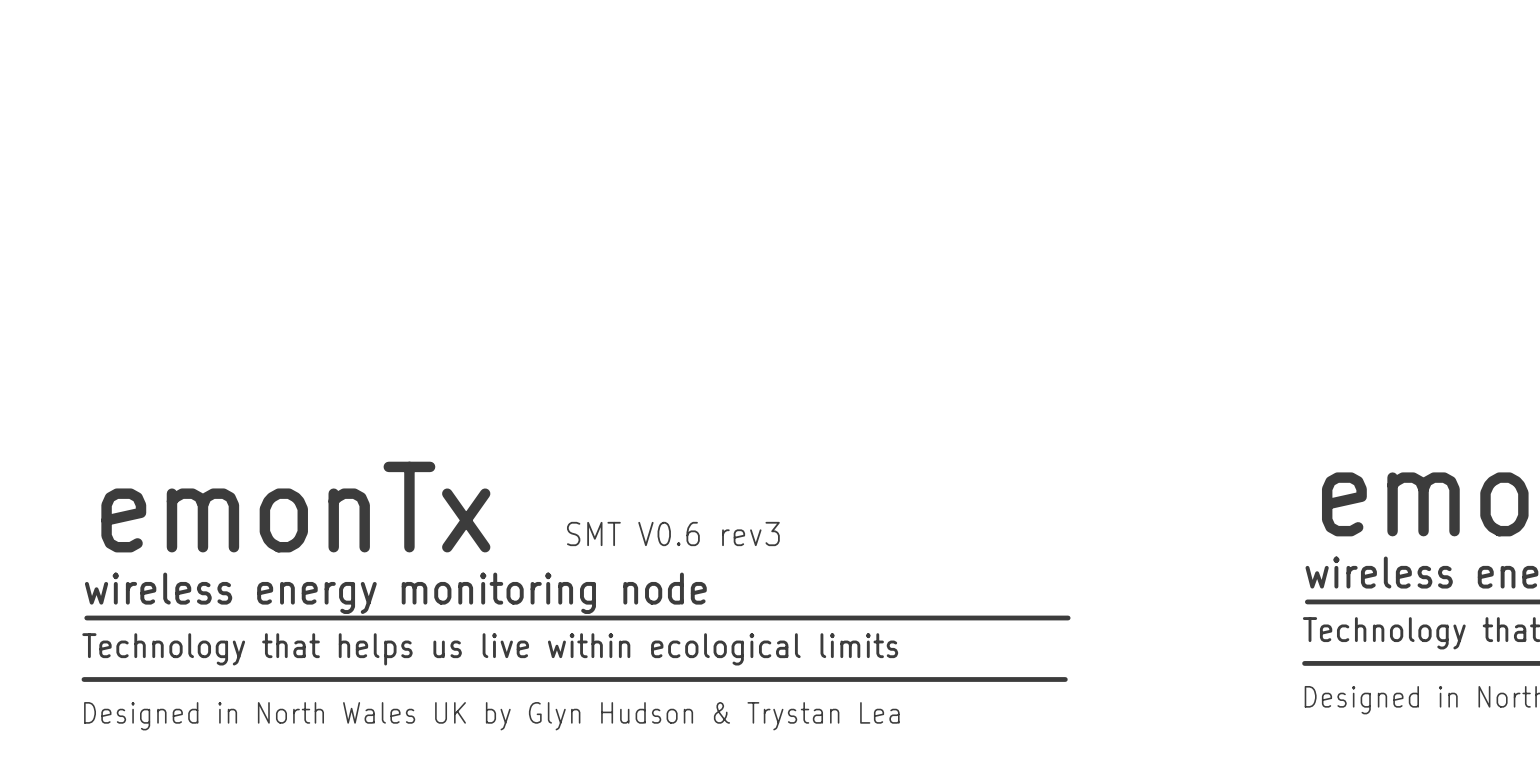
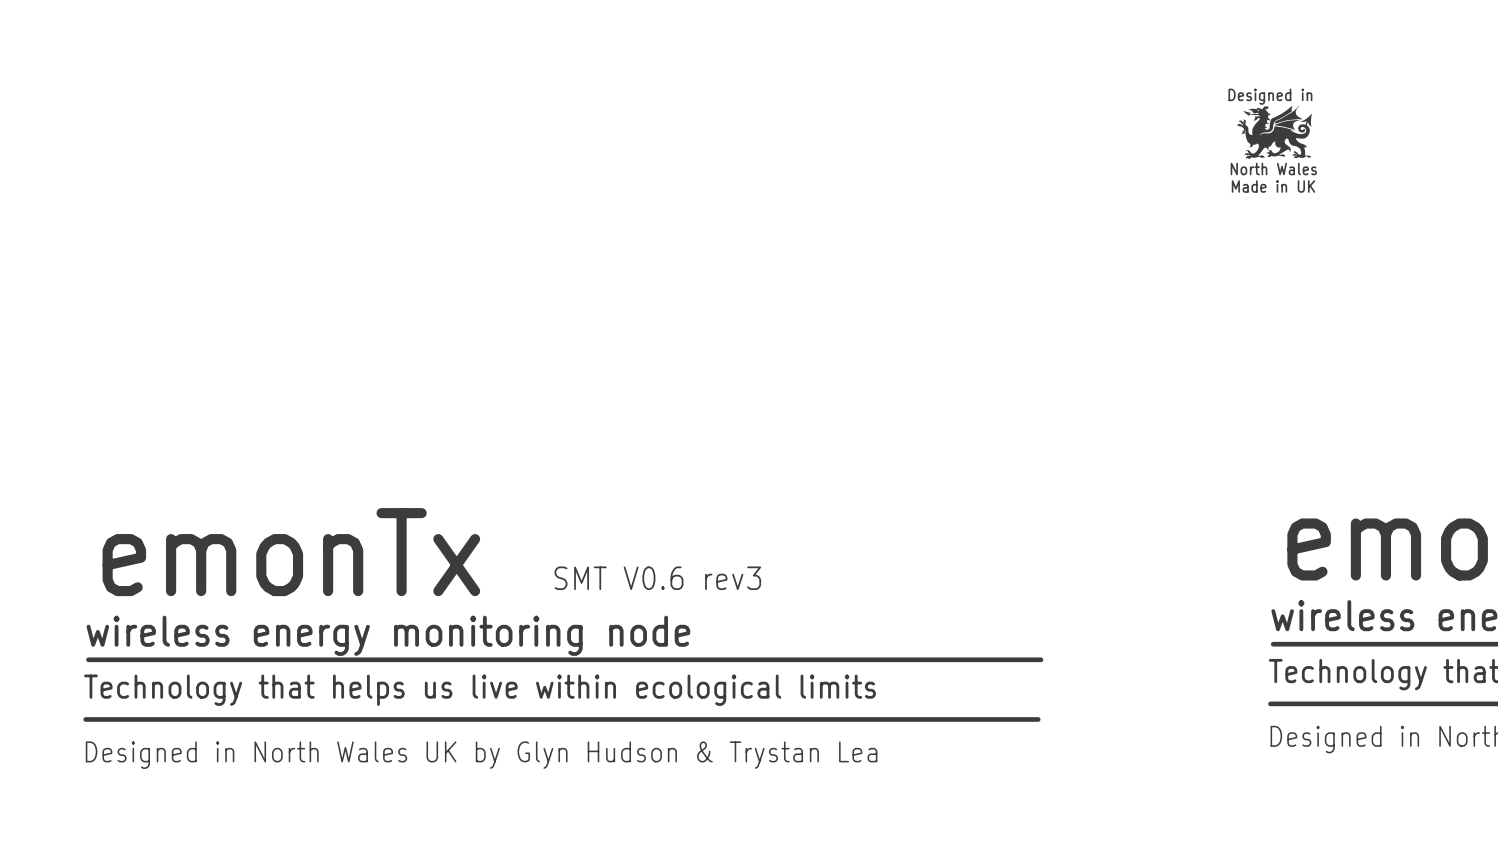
text: none -> Designed in (1270, 96)
drawing: none -> [1237, 106, 1313, 160]
text: none -> North Wales (1273, 169)
text: none -> Made in UK (1273, 186)

